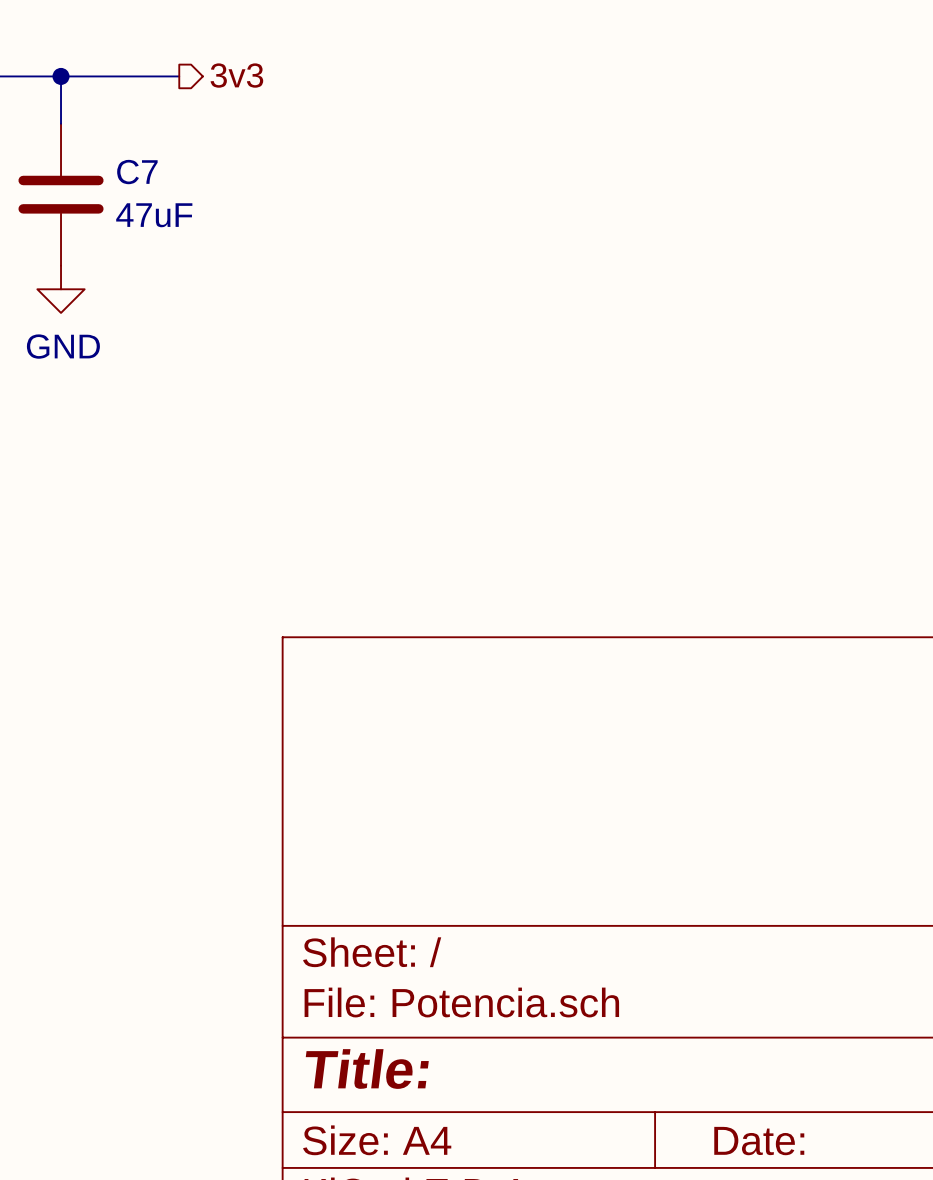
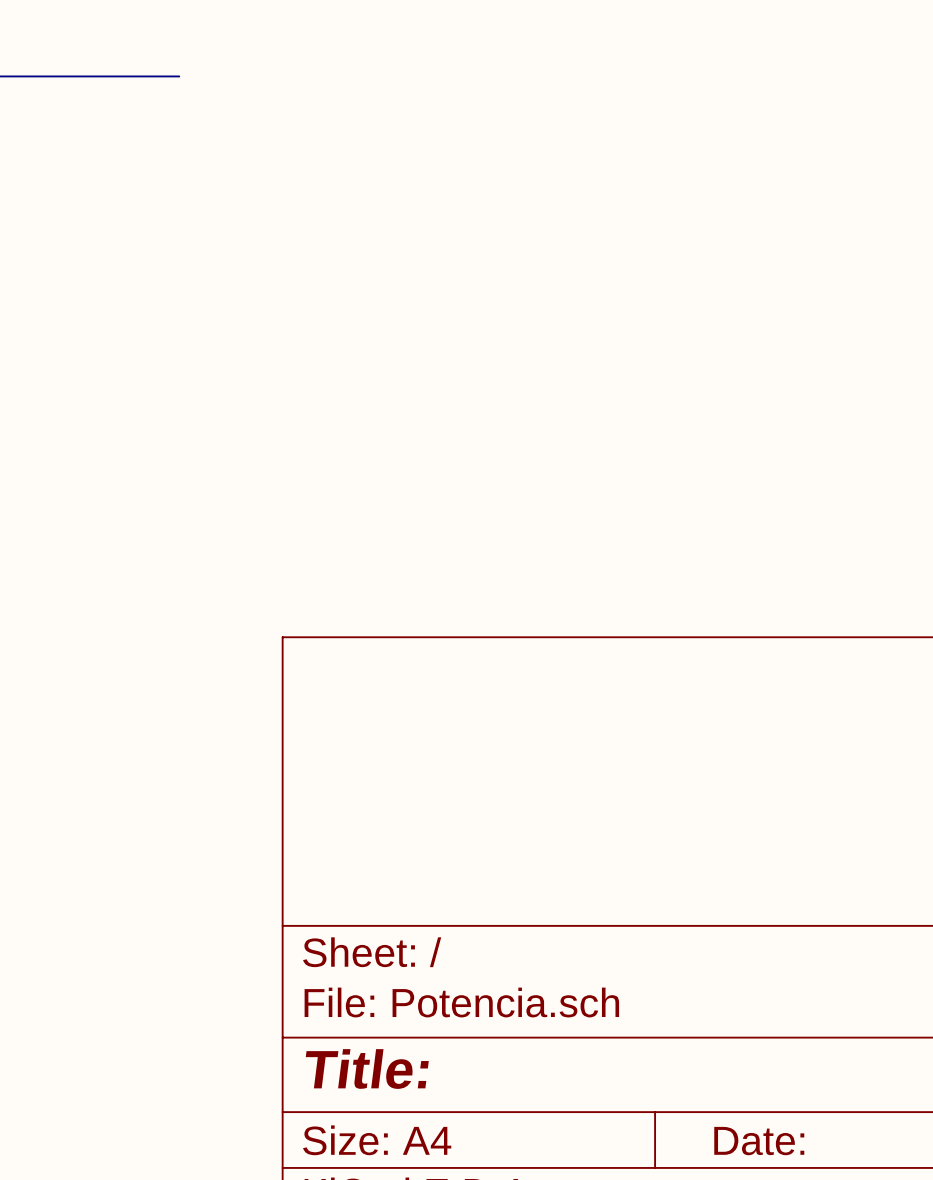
hierarchical label: 3v3 (236, 75) -> none
wire: (61, 76) (61, 123) -> none
junction: (61, 76) -> none
C7: 47uF (61, 194) -> none
power symbol: GND (61, 289) -> none

